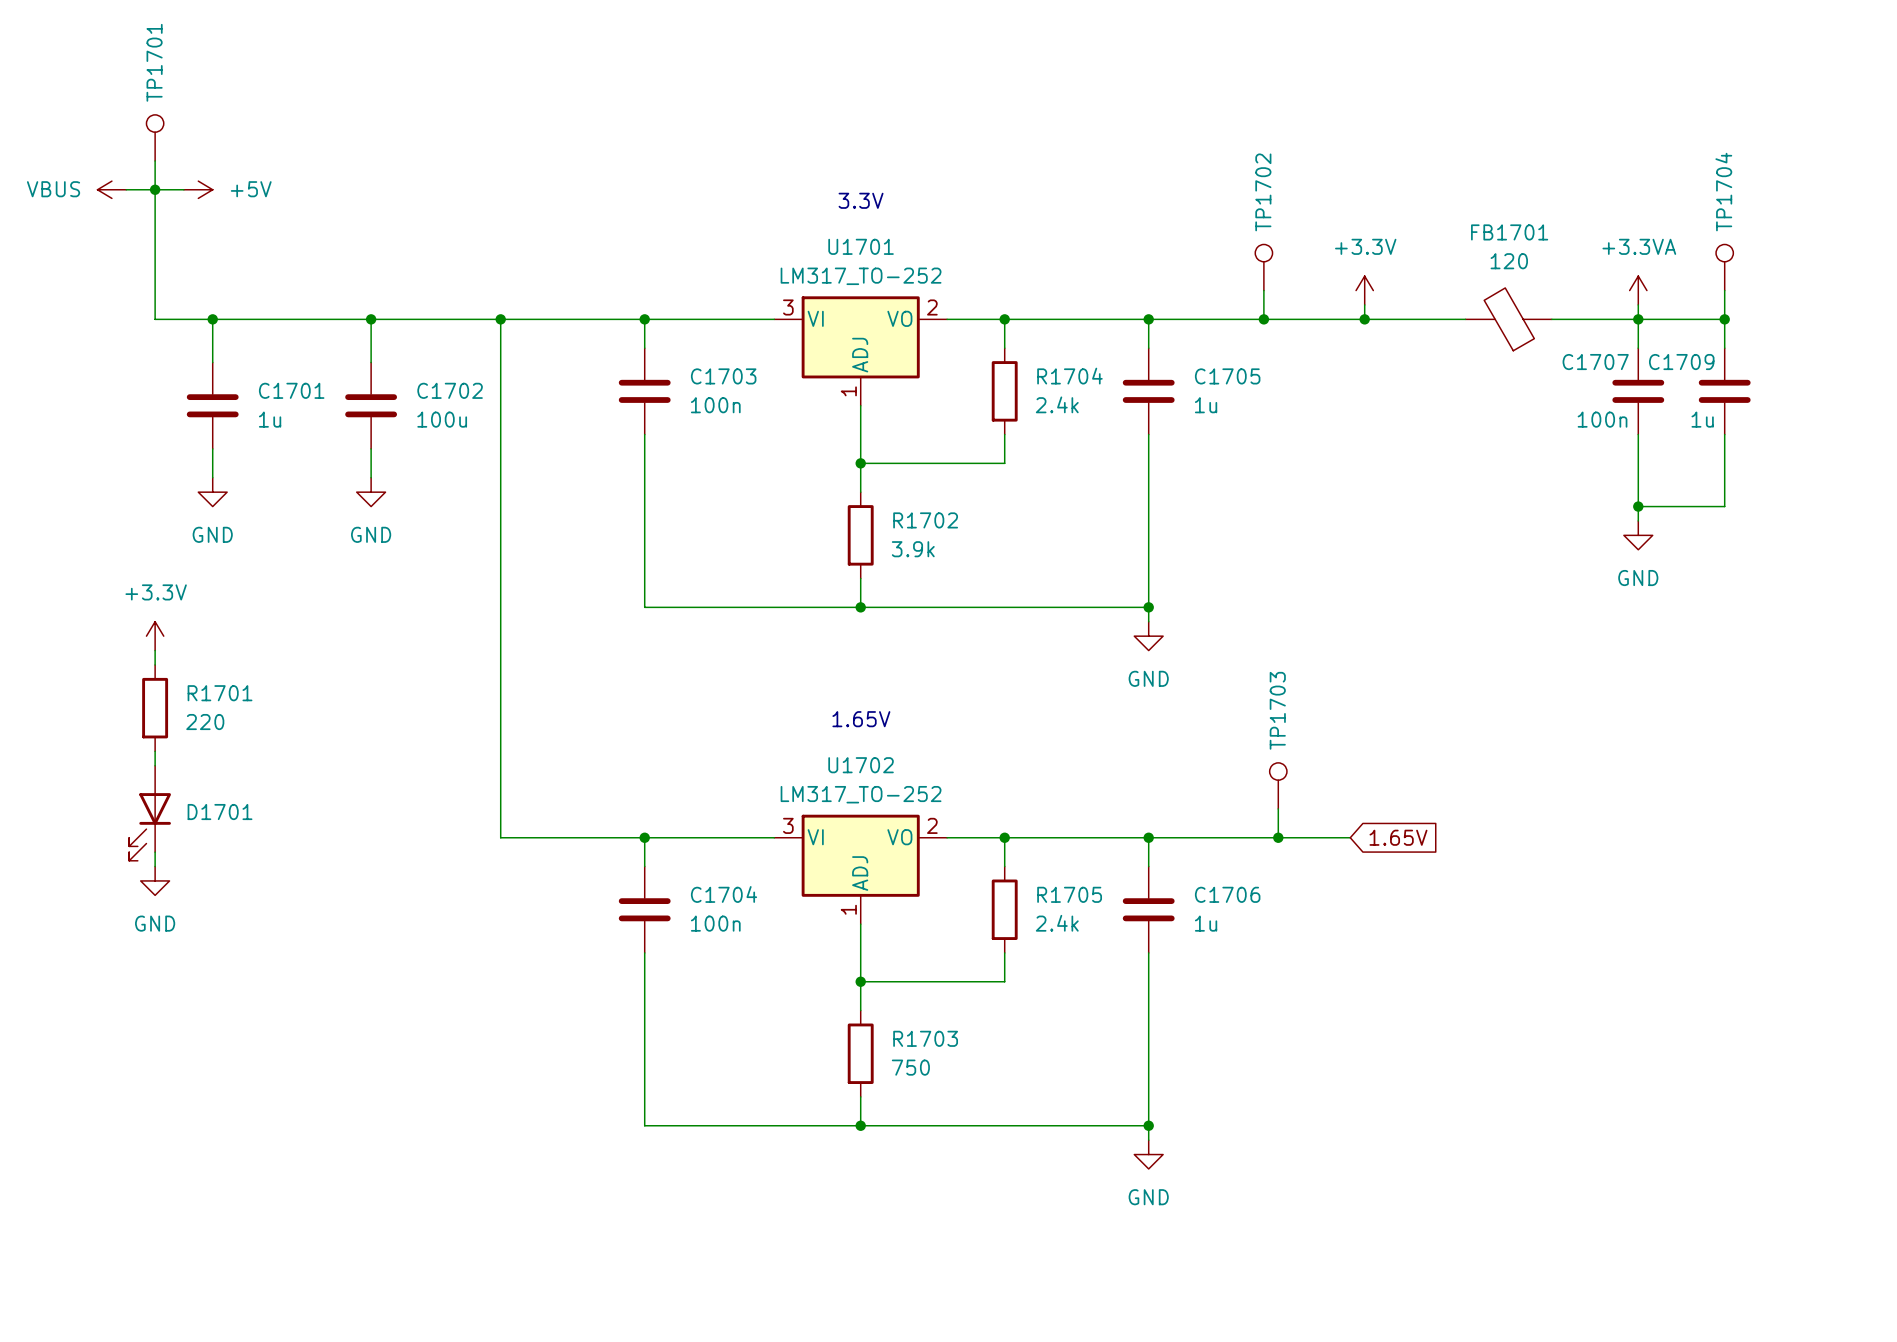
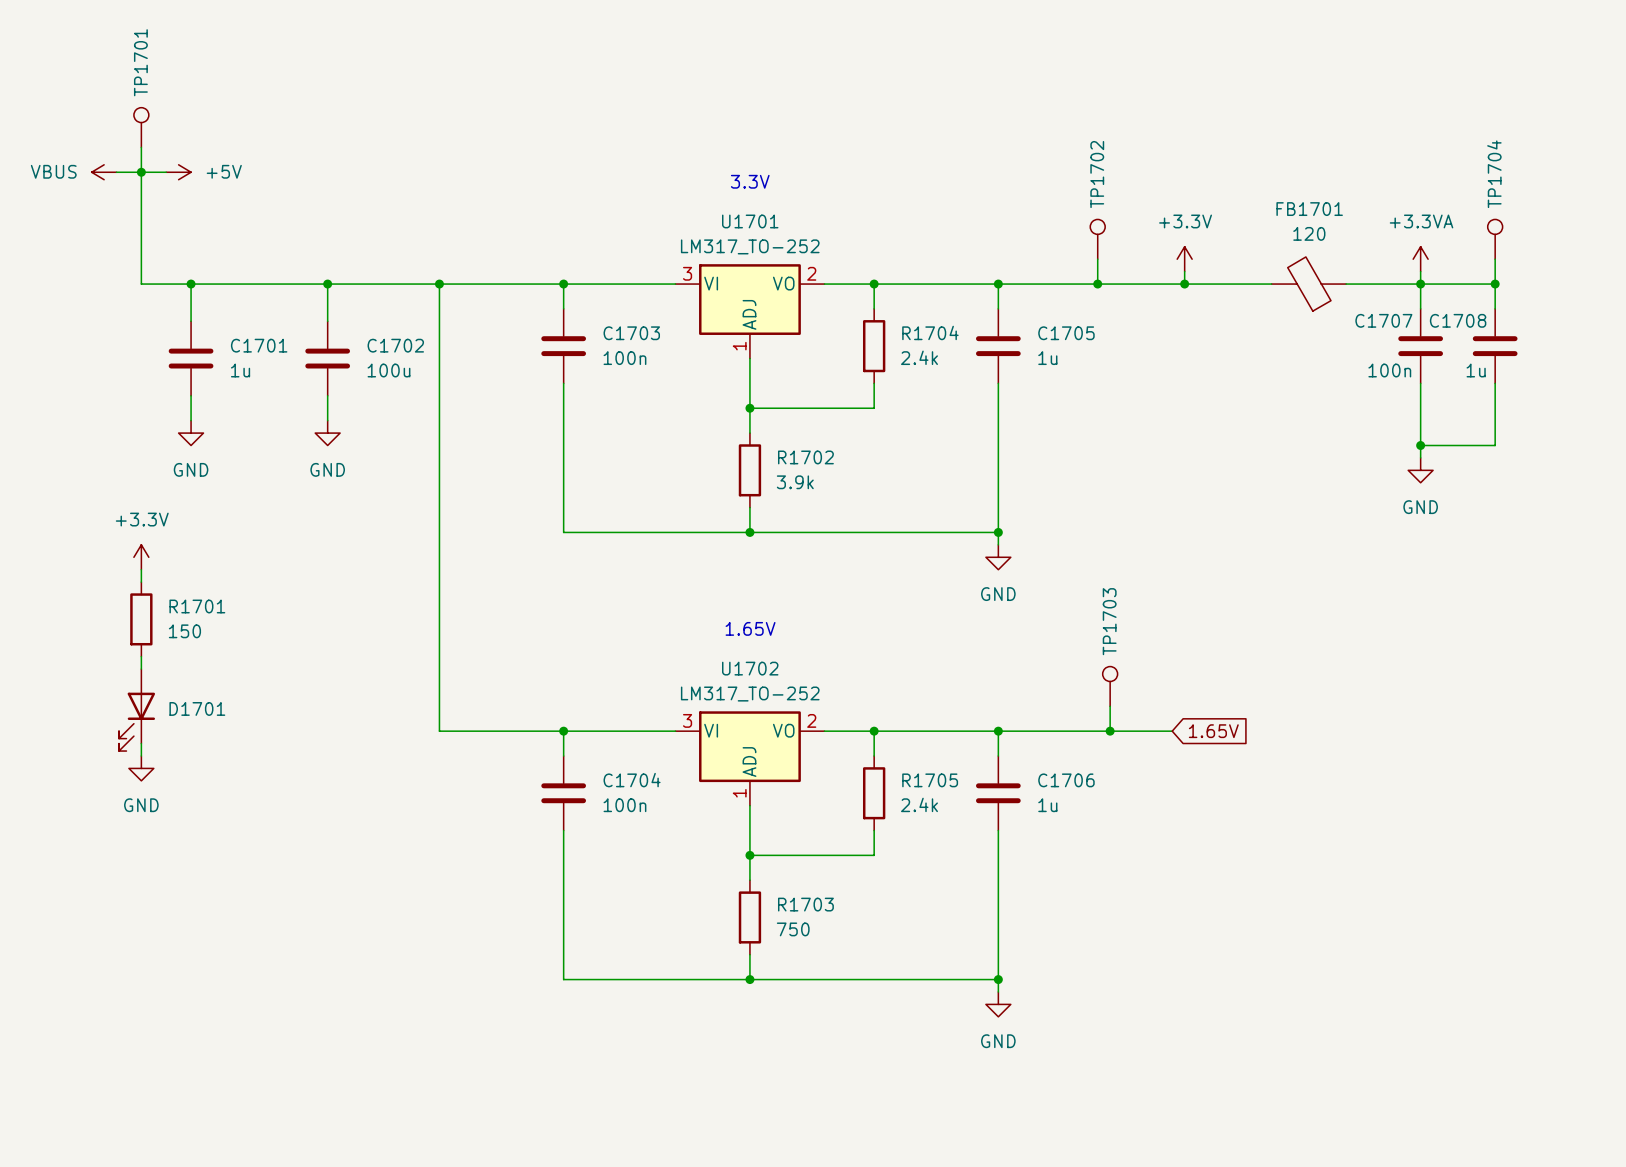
C1709 name: C1709 (1681, 362) -> C1708 (1458, 320)
R1701 value: 220 (205, 722) -> 150 (184, 631)

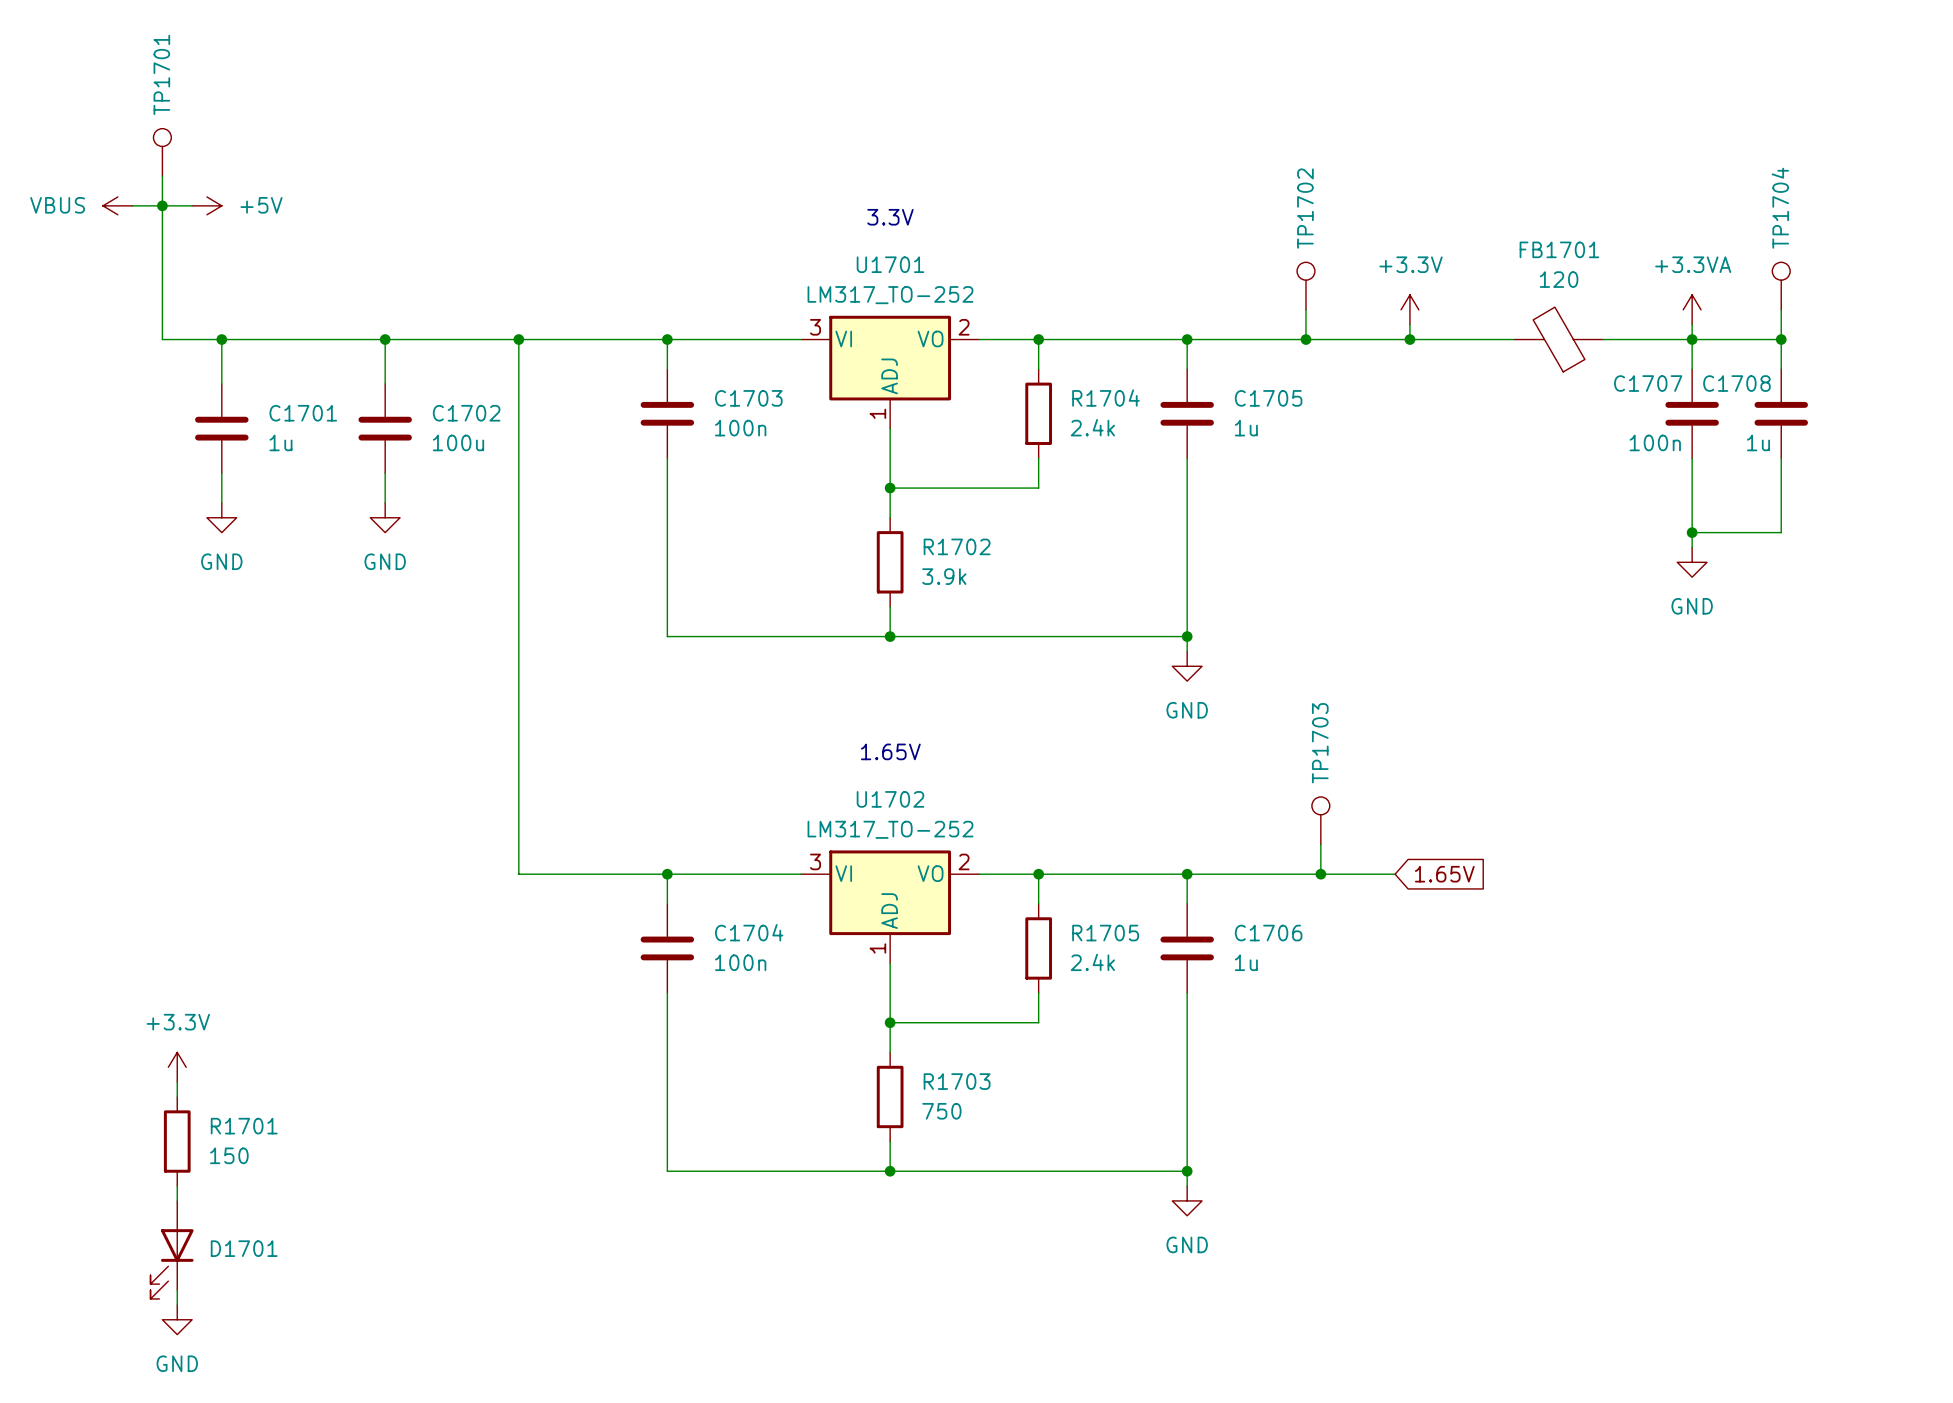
power symbol: +3.3V (141, 557) -> none
wire: (141, 569) (141, 582) -> none
R1701 position: (141, 619) -> (177, 1141)
wire: (141, 656) (141, 669) -> none
D1701 position: (137, 710) -> (172, 1249)
wire: (141, 743) (141, 756) -> (177, 1082) (177, 1096)
power symbol: GND (141, 768) -> none
power symbol: none -> +3.3V (177, 1067)
wire: none -> (177, 1186) (177, 1200)
wire: none -> (177, 1290) (177, 1304)
power symbol: none -> GND (177, 1319)

